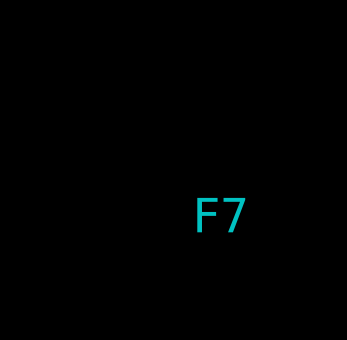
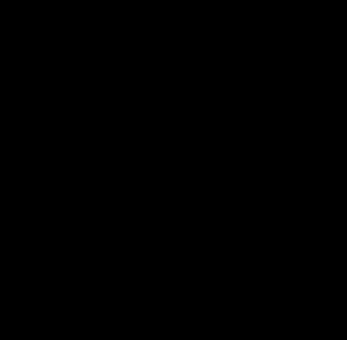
drawing: [197, 197, 246, 233] -> none

